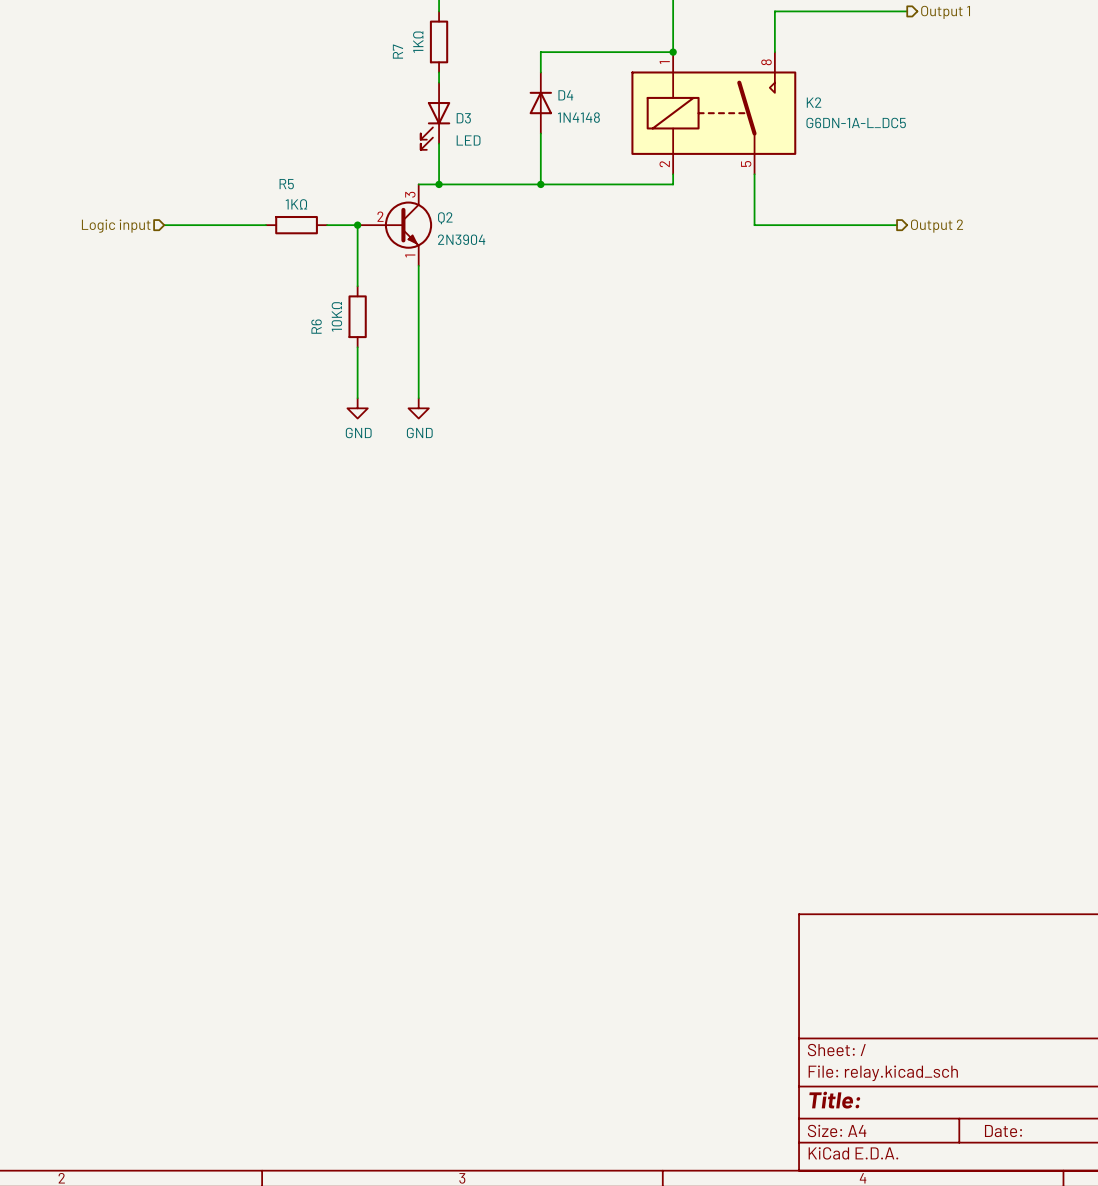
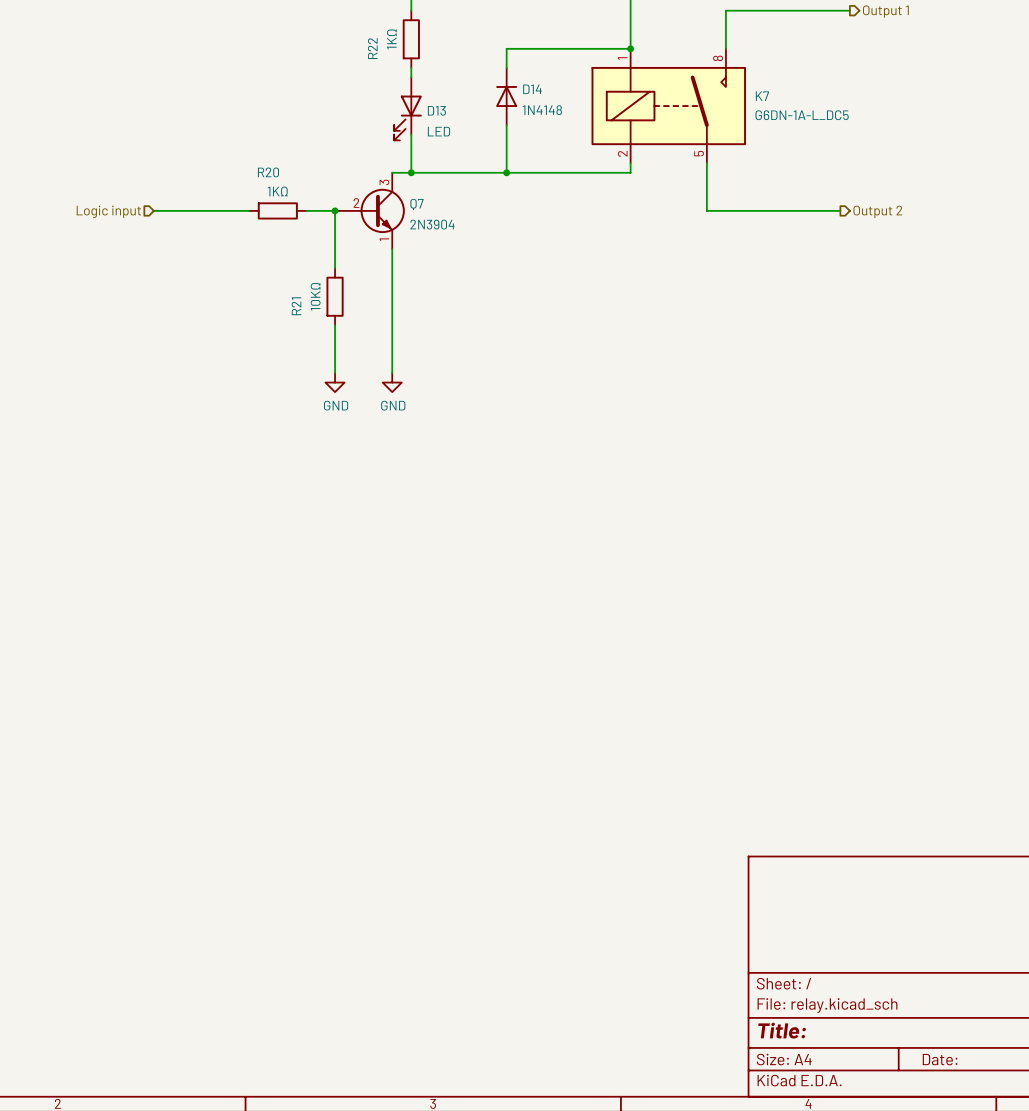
R7 name: R7 (397, 51) -> R22 (372, 48)
D4 name: D4 (565, 95) -> D14 (532, 89)
K2 name: K2 (814, 102) -> K7 (762, 96)
D3 name: D3 (463, 118) -> D13 (436, 110)
R5 name: R5 (286, 184) -> R20 (268, 172)
Q2 name: Q2 (445, 218) -> Q7 (416, 204)
R6 name: R6 (316, 326) -> R21 (296, 306)

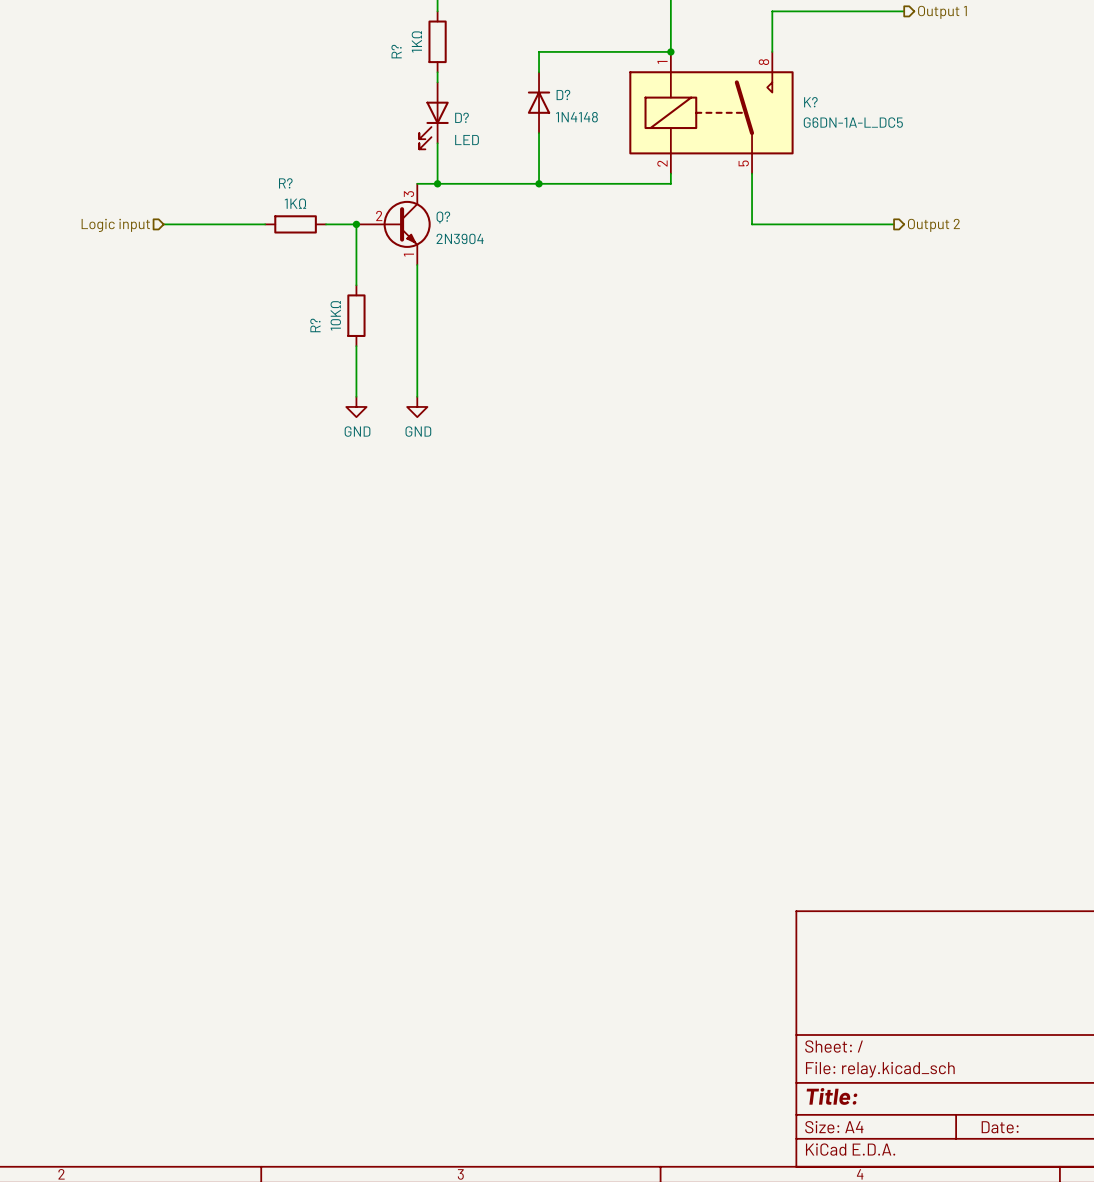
R22 name: R22 (372, 48) -> R? (396, 51)
D14 name: D14 (532, 89) -> D? (563, 94)
K7 name: K7 (762, 96) -> K? (810, 102)
D13 name: D13 (436, 110) -> D? (462, 117)
R20 name: R20 (268, 172) -> R? (285, 183)
Q7 name: Q7 (416, 204) -> Q? (443, 217)
R21 name: R21 (296, 306) -> R? (315, 325)

